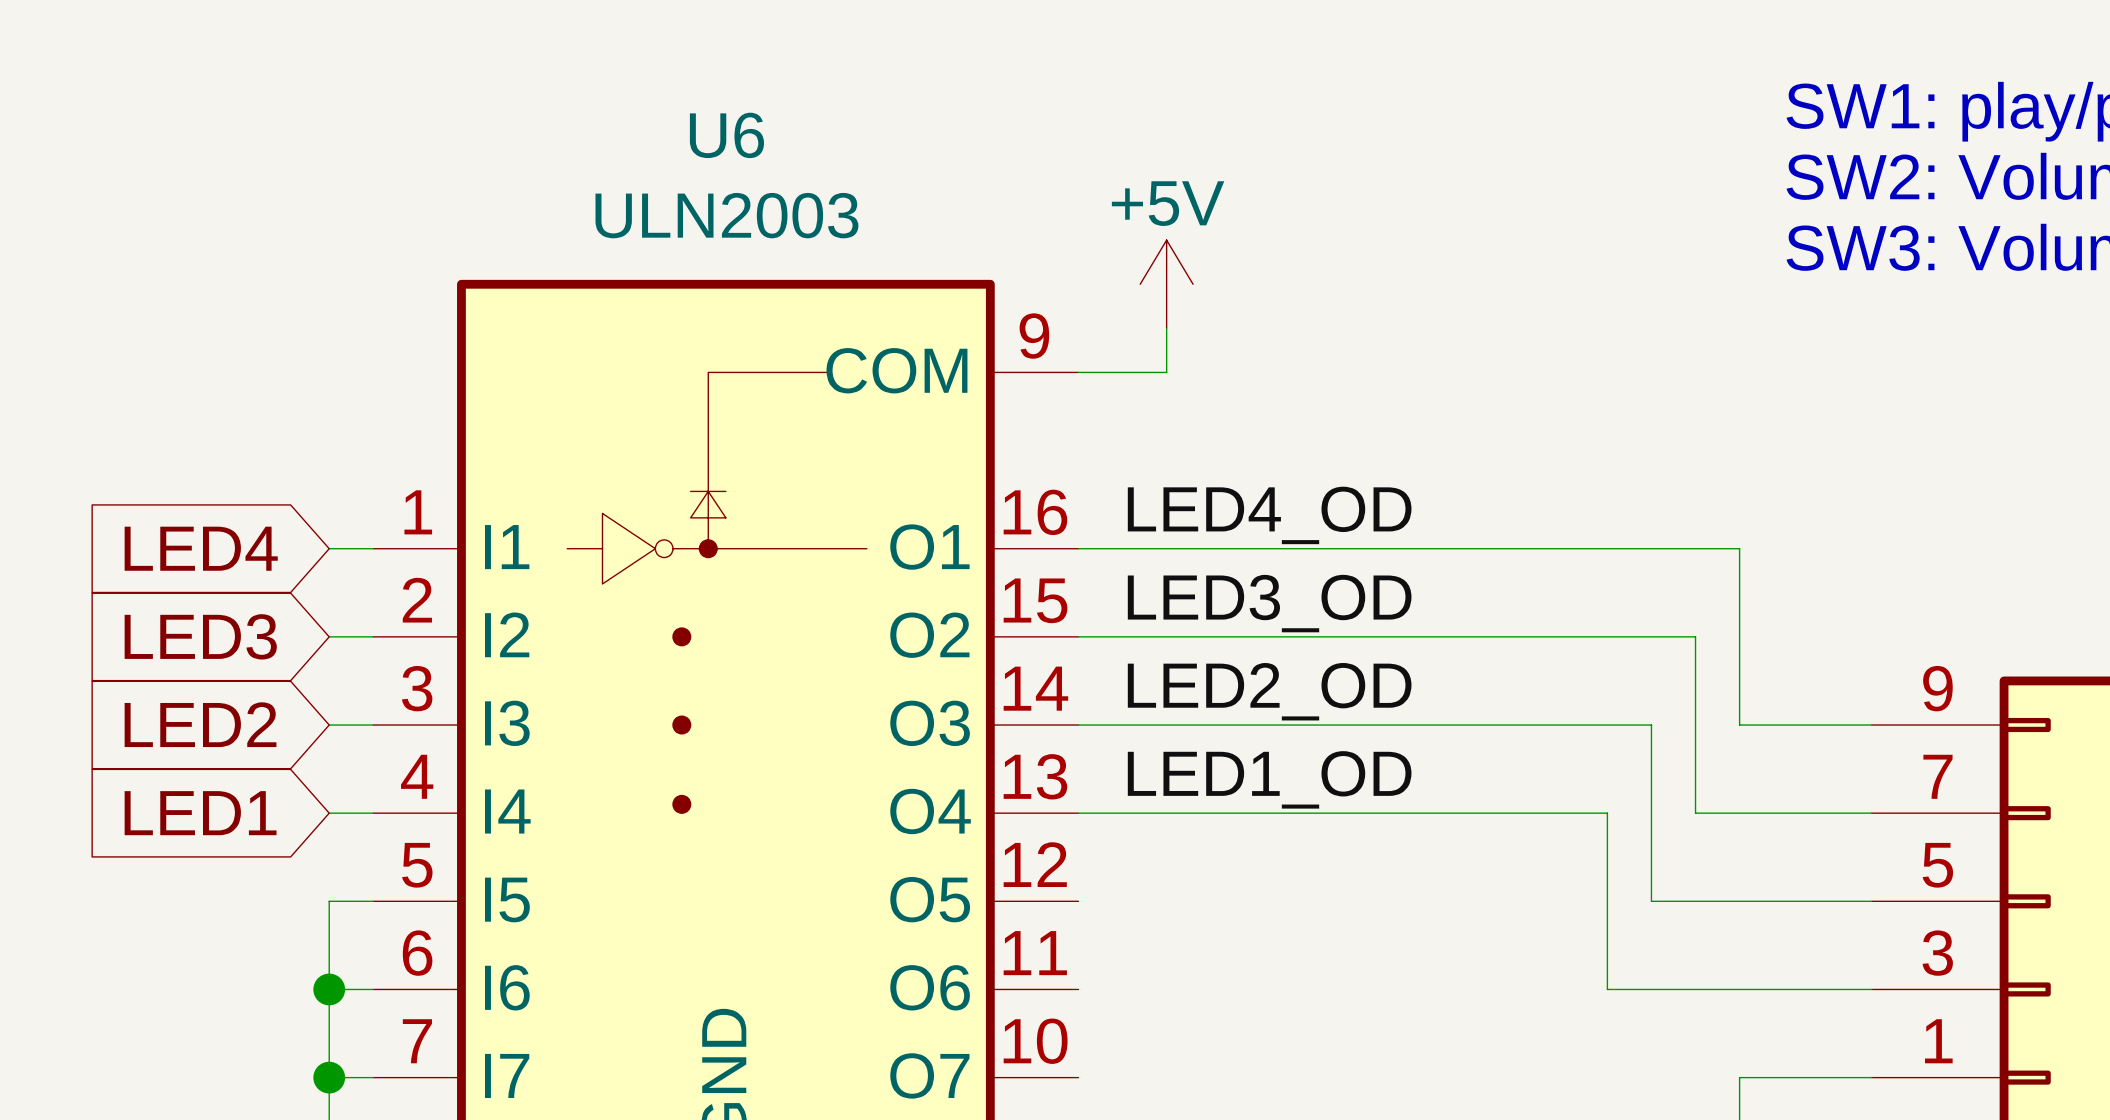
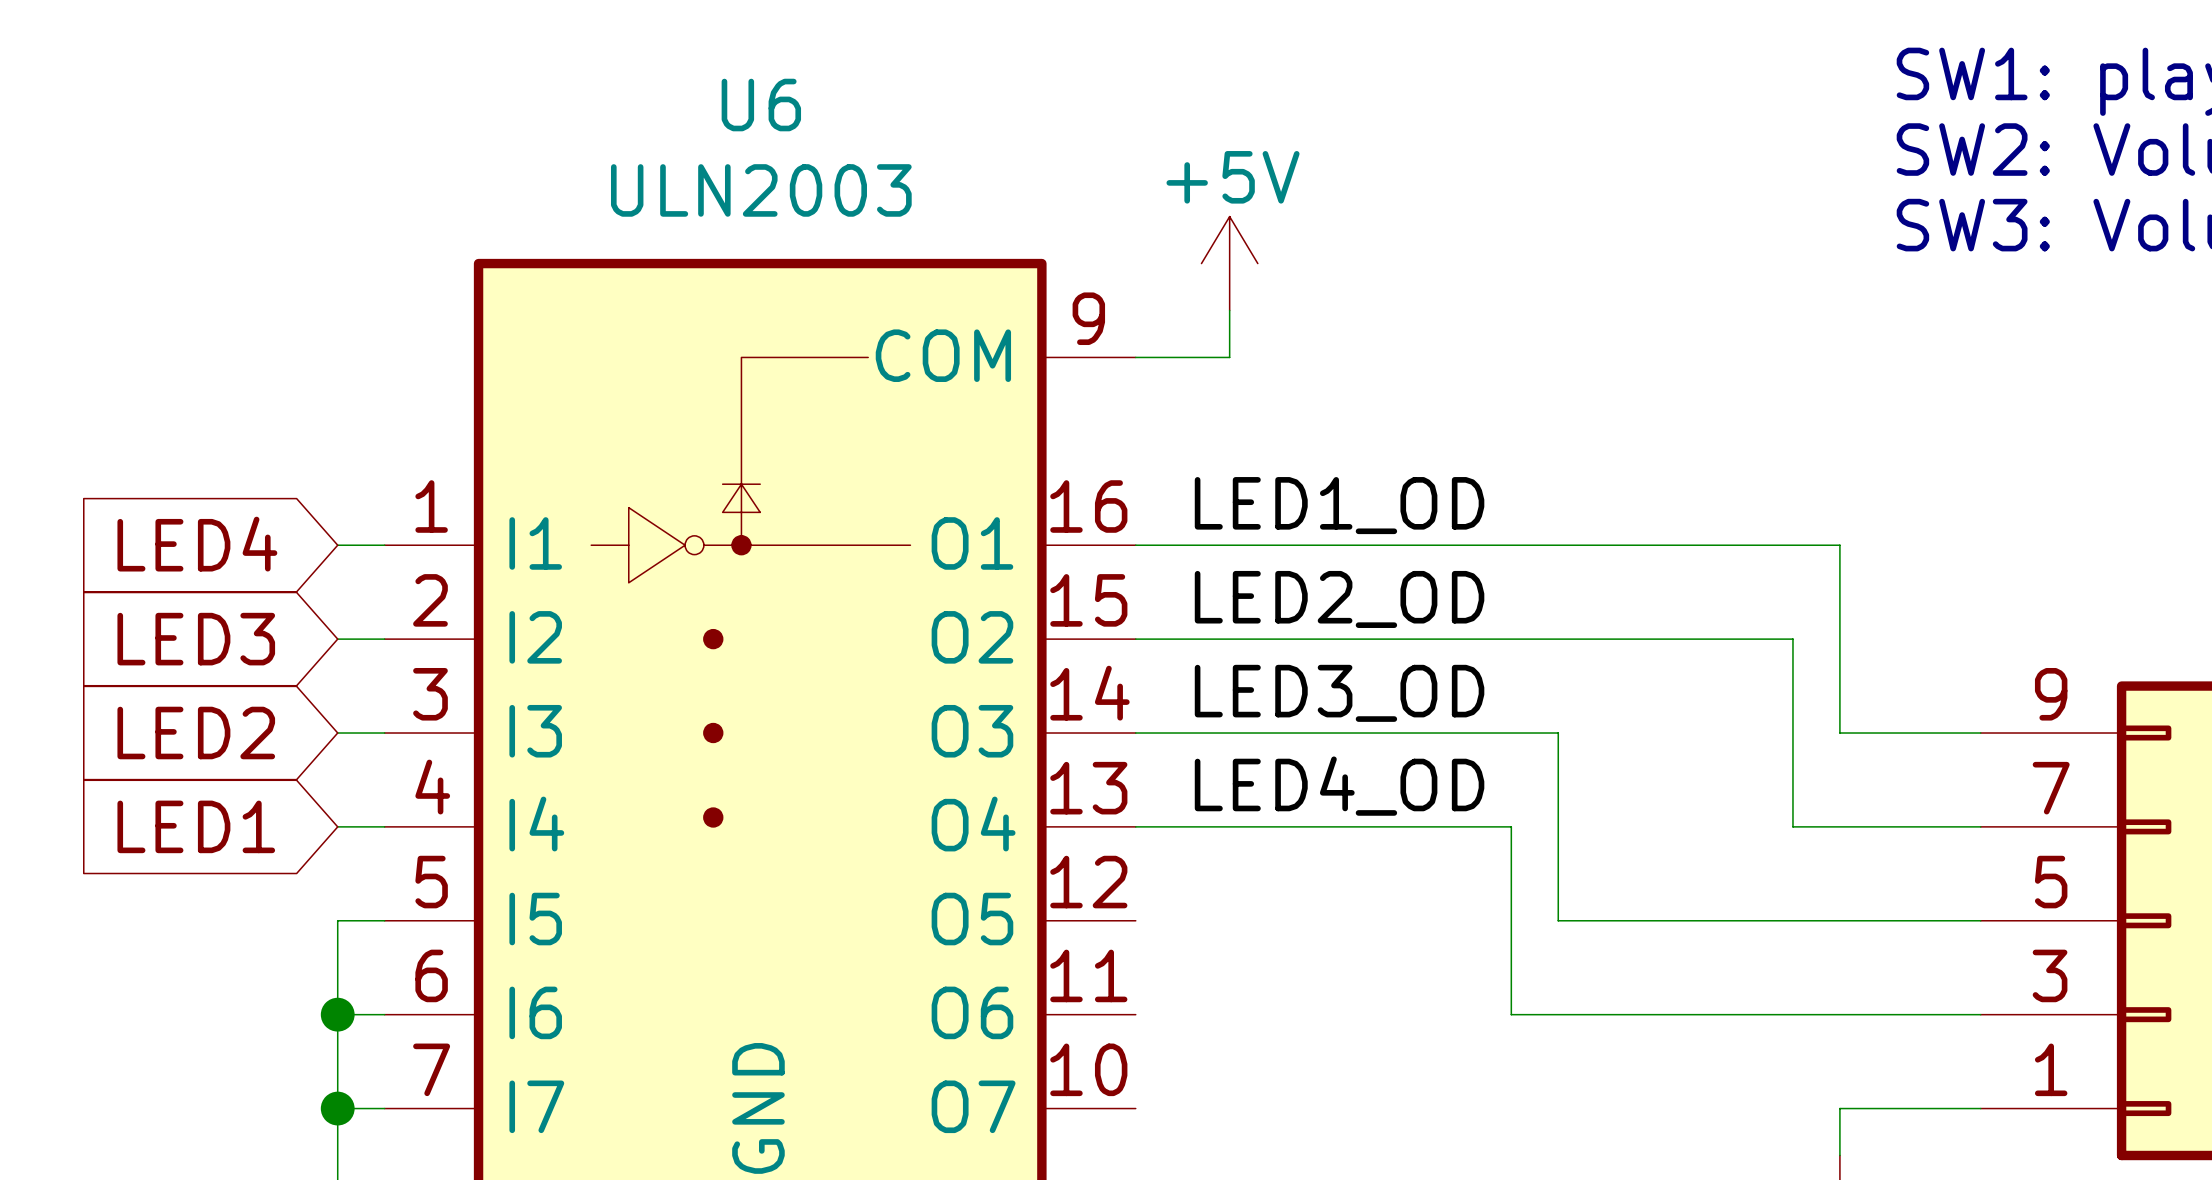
label: LED4_OD (1269, 515) -> LED1_OD (1339, 505)
label: LED3_OD (1269, 603) -> LED2_OD (1339, 599)
label: LED2_OD (1269, 691) -> LED3_OD (1339, 693)
wire: (1475, 725) (1651, 725) (1651, 901) -> (1558, 733) (1558, 920) (1746, 920)
label: LED1_OD (1269, 779) -> LED4_OD (1339, 786)
wire: (1431, 813) (1607, 813) (1607, 989) -> (1511, 826) (1511, 1014) (1699, 1014)

